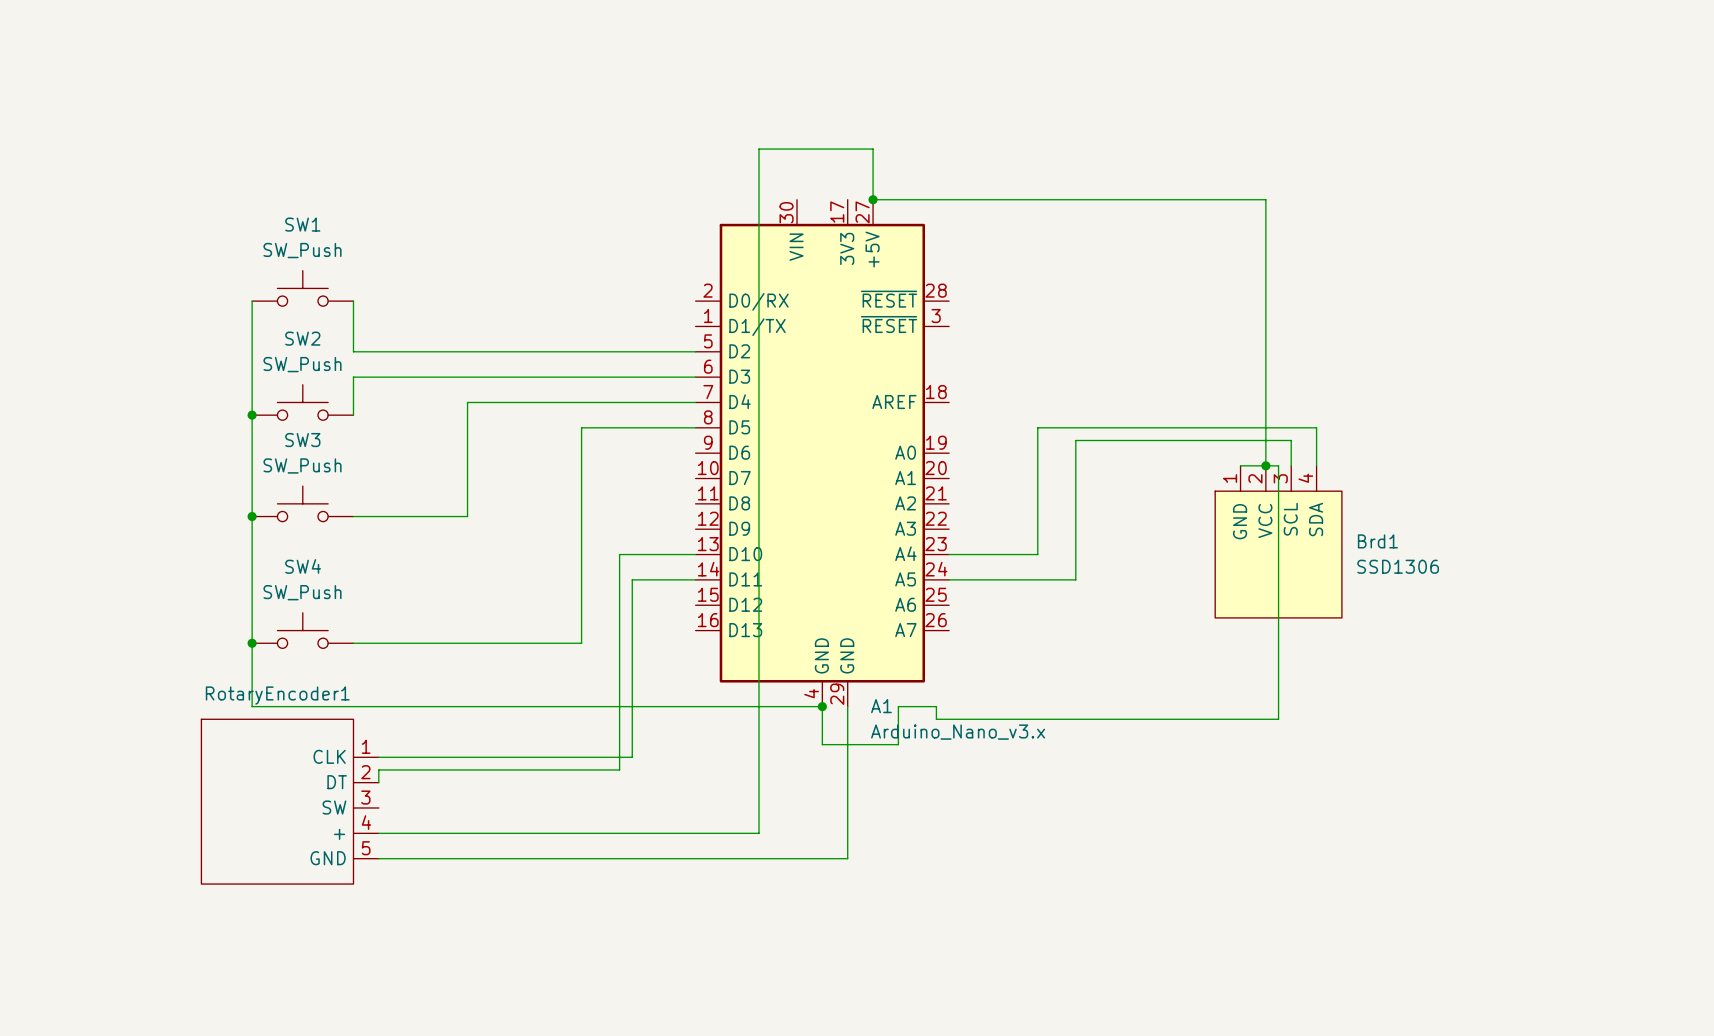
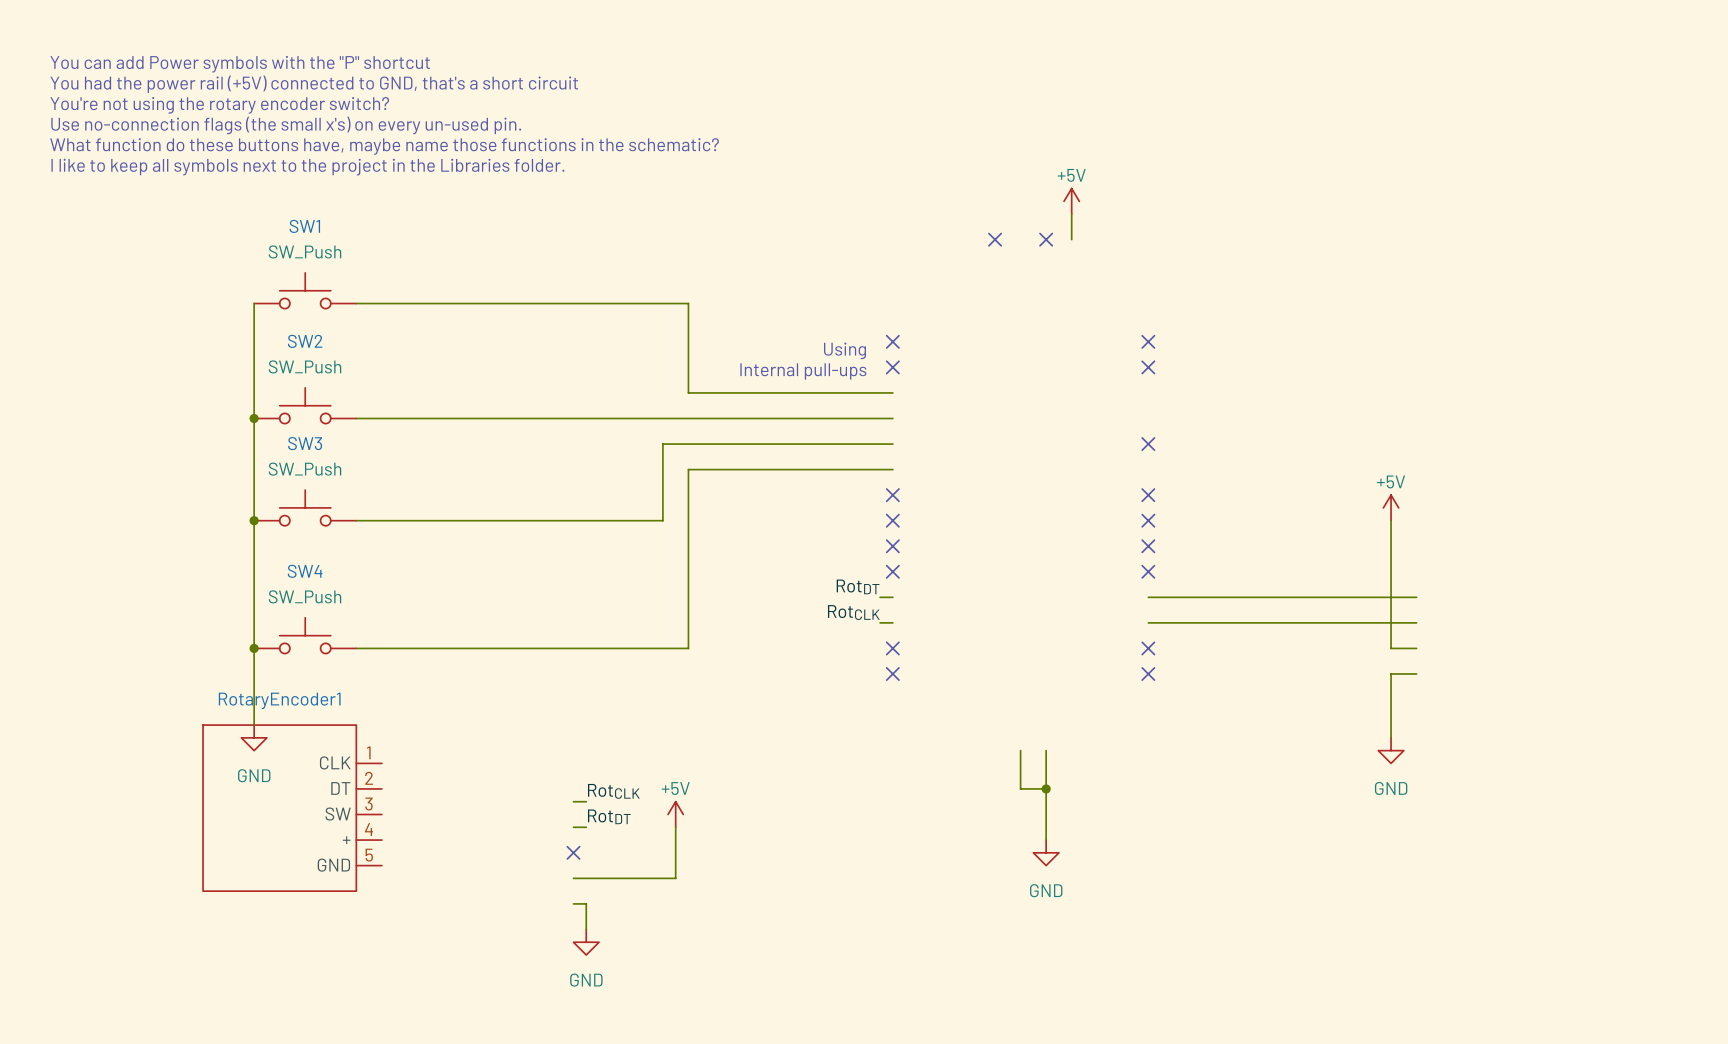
text: none -> You can add Power symbols with the "P" shortcut (240, 64)
text: none -> You had the power rail (+5V) connected to GND, that's a short circuit (314, 84)
text: none -> You're not using the rotary encoder switch? (219, 105)
text: none -> Use no-connection flags (the small x's) on every un-used pin. (286, 125)
text: none -> What function do these buttons have, maybe name those functions in the schematic? (384, 146)
text: none -> I like to keep all symbols next to the project in the Libraries folder. (307, 167)
junction: (873, 199) -> none
power symbol: none -> +5V (1071, 201)
wire: none -> (1071, 214) (1071, 239)
no-connect mark: none -> (995, 239)
no-connect mark: none -> (1046, 239)
wire: (353, 301) (353, 351) (695, 351) -> (356, 303) (688, 303) (688, 392) (892, 392)
no-connect mark: none -> (892, 341)
no-connect mark: none -> (1148, 341)
text: none -> Using (845, 350)
no-connect mark: none -> (892, 367)
no-connect mark: none -> (1148, 367)
text: none -> Internal pull-ups (803, 371)
wire: (695, 377) (353, 377) (353, 415) -> (892, 418) (356, 418)
wire: (695, 402) (467, 402) (467, 516) -> (892, 444) (662, 444) (662, 520) (471, 520)
wire: (695, 427) (581, 427) (581, 643) -> (892, 469) (688, 469) (688, 648) (586, 648)
no-connect mark: none -> (1148, 444)
A1: Arduino_Nano_v3.x (822, 453) -> none
wire: (1240, 465) (1278, 465) (1278, 719) (936, 719) (936, 706) (898, 706) (898, 744) (822, 744) (822, 706) (252, 706) -> (254, 725) (254, 712)
wire: (1265, 465) (1265, 199) (873, 199) (873, 149) (758, 149) (758, 833) (378, 833) -> none
junction: (1265, 465) -> none
wire: (1291, 465) (1291, 440) (1075, 440) (1075, 579) (949, 579) -> none
wire: (1316, 465) (1316, 427) (1037, 427) (1037, 554) (949, 554) -> none
no-connect mark: none -> (892, 495)
no-connect mark: none -> (1148, 495)
power symbol: none -> +5V (1391, 507)
no-connect mark: none -> (892, 520)
no-connect mark: none -> (1148, 520)
wire: none -> (1391, 520) (1391, 648) (1416, 648)
no-connect mark: none -> (892, 546)
no-connect mark: none -> (1148, 546)
Brd1: SSD1306 (1278, 541) -> none
wire: (695, 554) (619, 554) (619, 769) (378, 769) (378, 782) -> none
no-connect mark: none -> (892, 571)
no-connect mark: none -> (1148, 571)
wire: (695, 579) (632, 579) (632, 757) (378, 757) -> none
label: none -> RotDT (858, 586)
wire: none -> (1148, 597) (1416, 597)
label: none -> RotCLK (853, 612)
wire: none -> (1148, 622) (1416, 622)
no-connect mark: none -> (892, 648)
no-connect mark: none -> (1148, 648)
no-connect mark: none -> (892, 673)
no-connect mark: none -> (1148, 673)
wire: none -> (1416, 673) (1391, 673) (1391, 737)
junction: (822, 706) -> none
wire: (847, 706) (847, 858) (378, 858) -> none
power symbol: none -> GND (254, 737)
wire: none -> (1020, 750) (1020, 788) (1046, 788)
wire: none -> (1046, 750) (1046, 840)
power symbol: none -> GND (1391, 750)
junction: none -> (1046, 788)
label: none -> RotCLK (613, 791)
wire: none -> (573, 801) (586, 801)
power symbol: none -> +5V (675, 814)
label: none -> RotDT (609, 816)
wire: none -> (573, 827) (586, 827)
wire: none -> (675, 827) (675, 878) (573, 878)
no-connect mark: none -> (573, 852)
power symbol: none -> GND (1046, 852)
wire: none -> (573, 903) (586, 903) (586, 929)
power symbol: none -> GND (586, 942)

